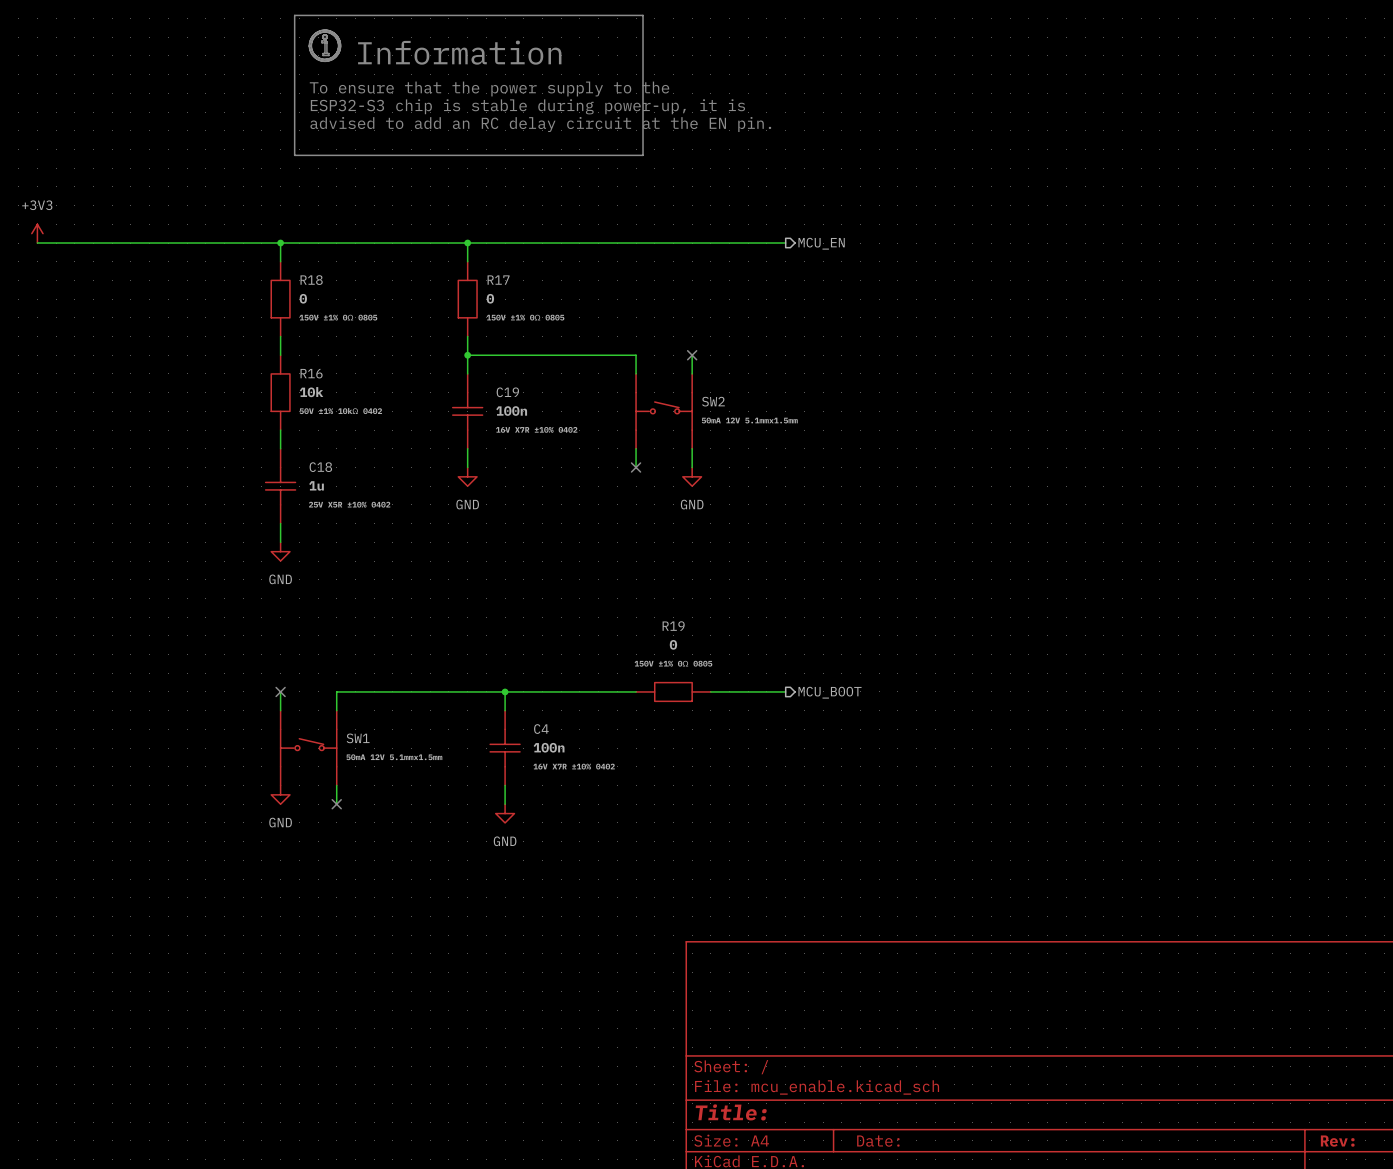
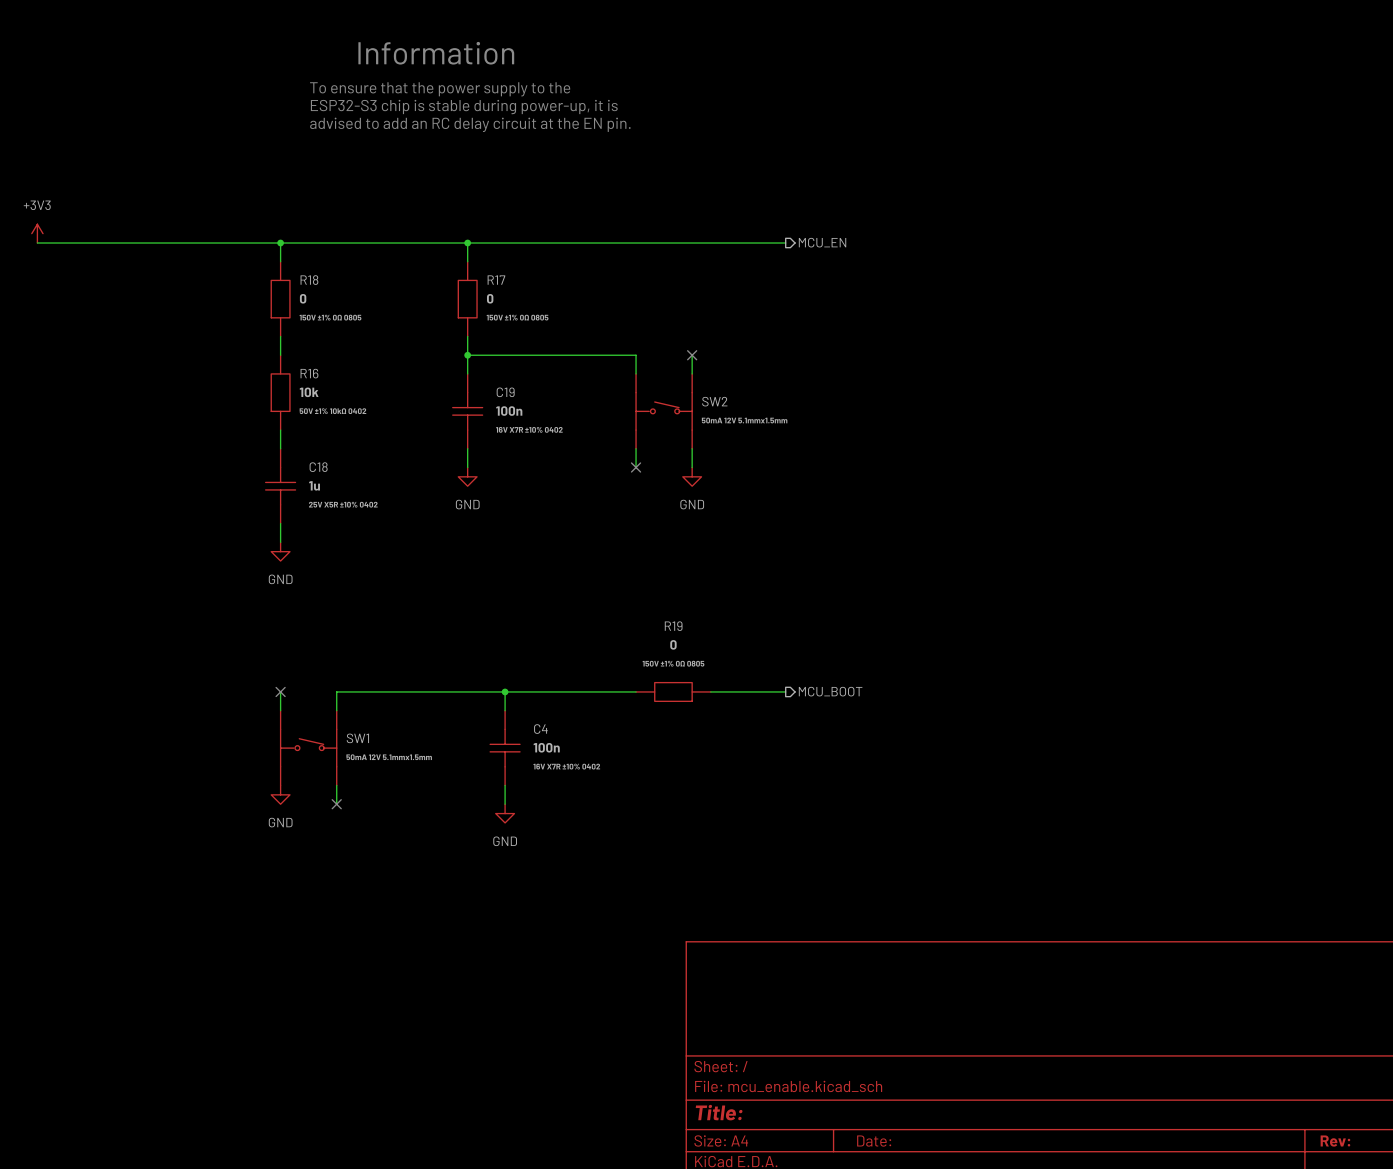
line: (294, 15) (643, 15) (643, 155) (294, 155) (294, 15) -> none
line: (324, 30) (313, 34) (309, 45) (313, 56) (325, 61) (336, 56) (340, 45) (336, 34) (324, 30) -> none
line: (324, 40) (322, 40) (322, 42) (324, 42) (324, 53) (323, 55) (328, 55) (326, 53) (326, 42) -> none
line: (311, 46) (315, 55) (325, 59) (335, 54) (338, 45) (334, 35) (324, 32) (315, 36) (311, 46) -> none

